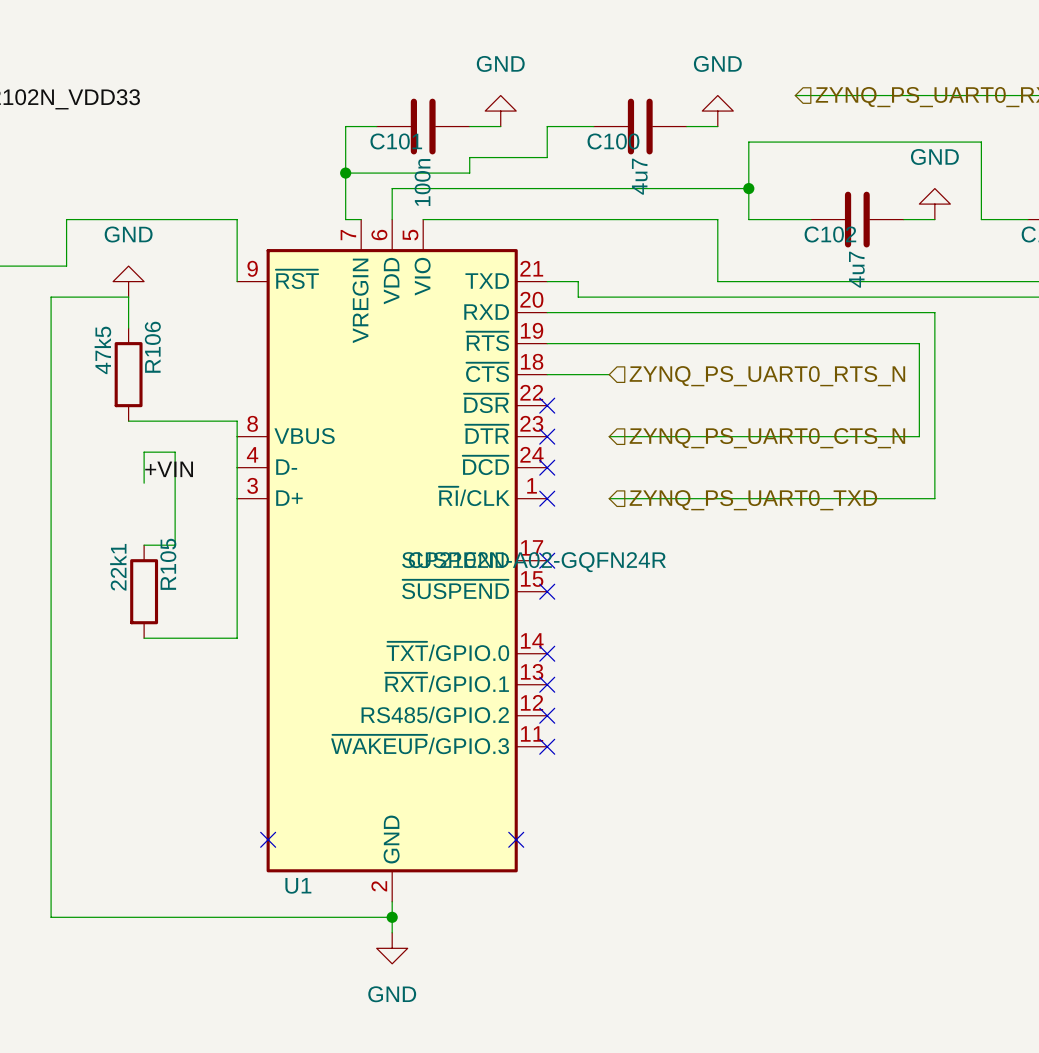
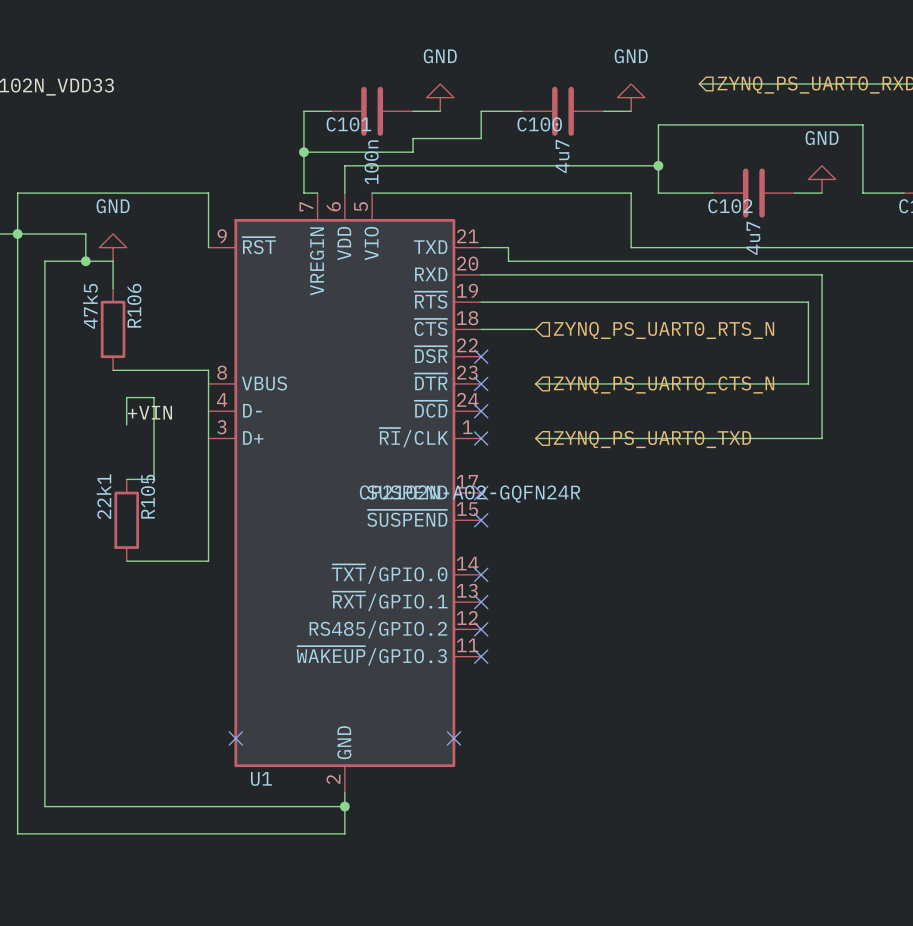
wire: (66, 219) (66, 266) -> (85, 261) (85, 233) (58, 233)
wire: none -> (58, 193) (17, 193) (17, 833) (344, 833) (344, 820)
junction: none -> (17, 233)
junction: none -> (85, 261)
power symbol: GND (392, 948) -> none

